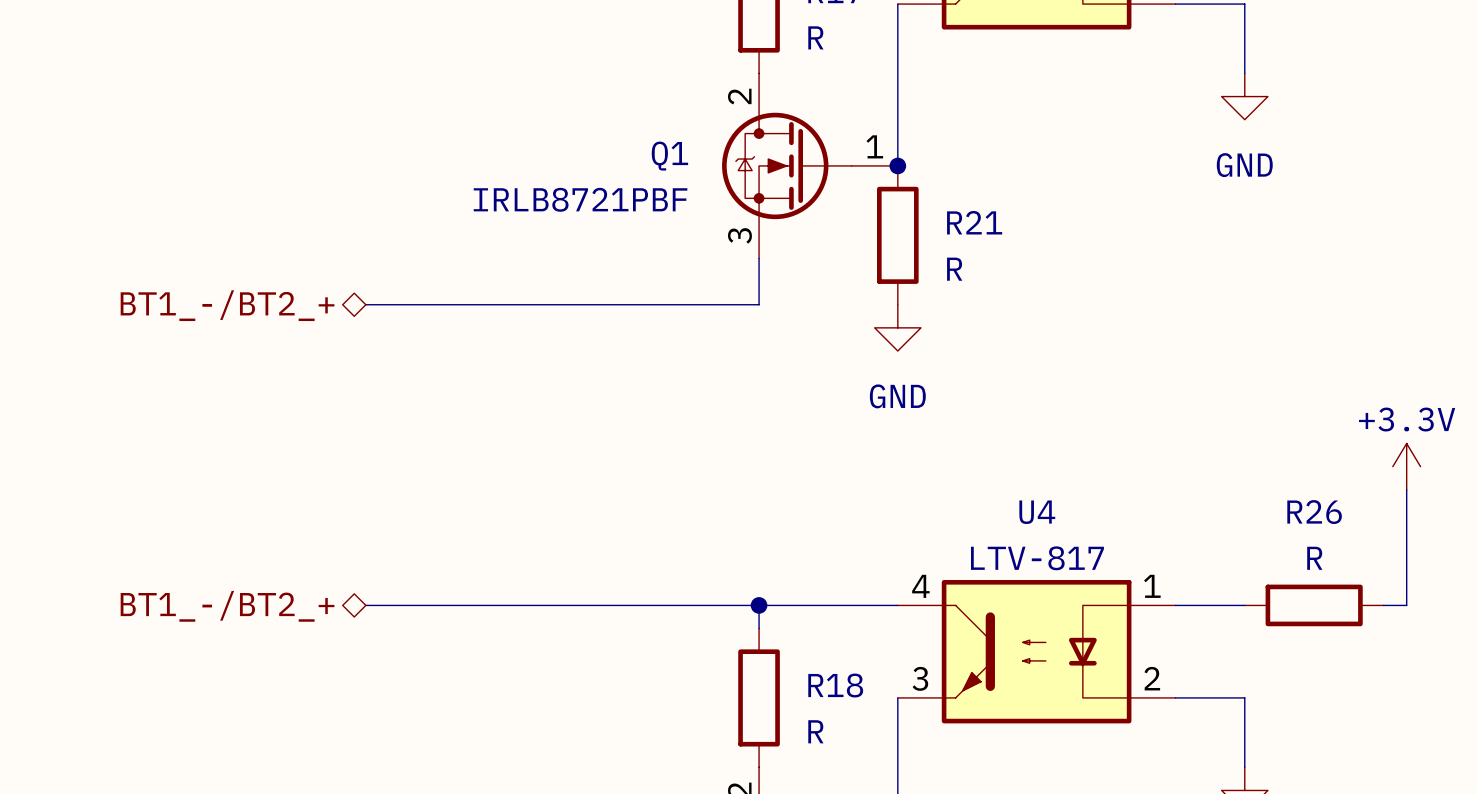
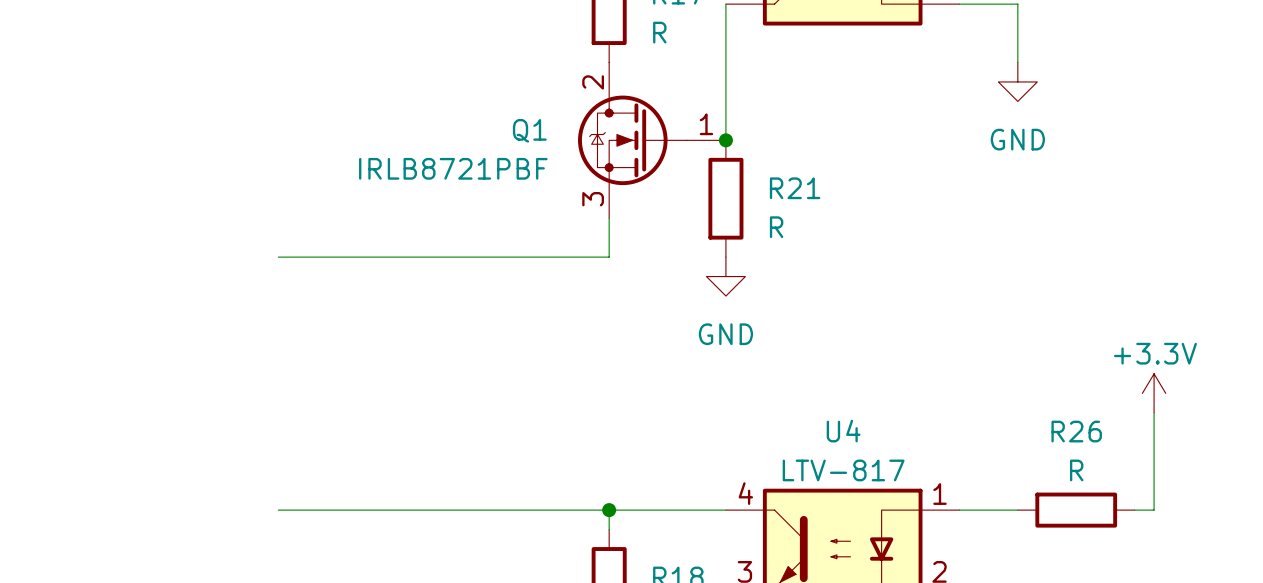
hierarchical label: BT1_-/BT2_+ (227, 305) -> none
hierarchical label: BT1_-/BT2_+ (227, 606) -> none

